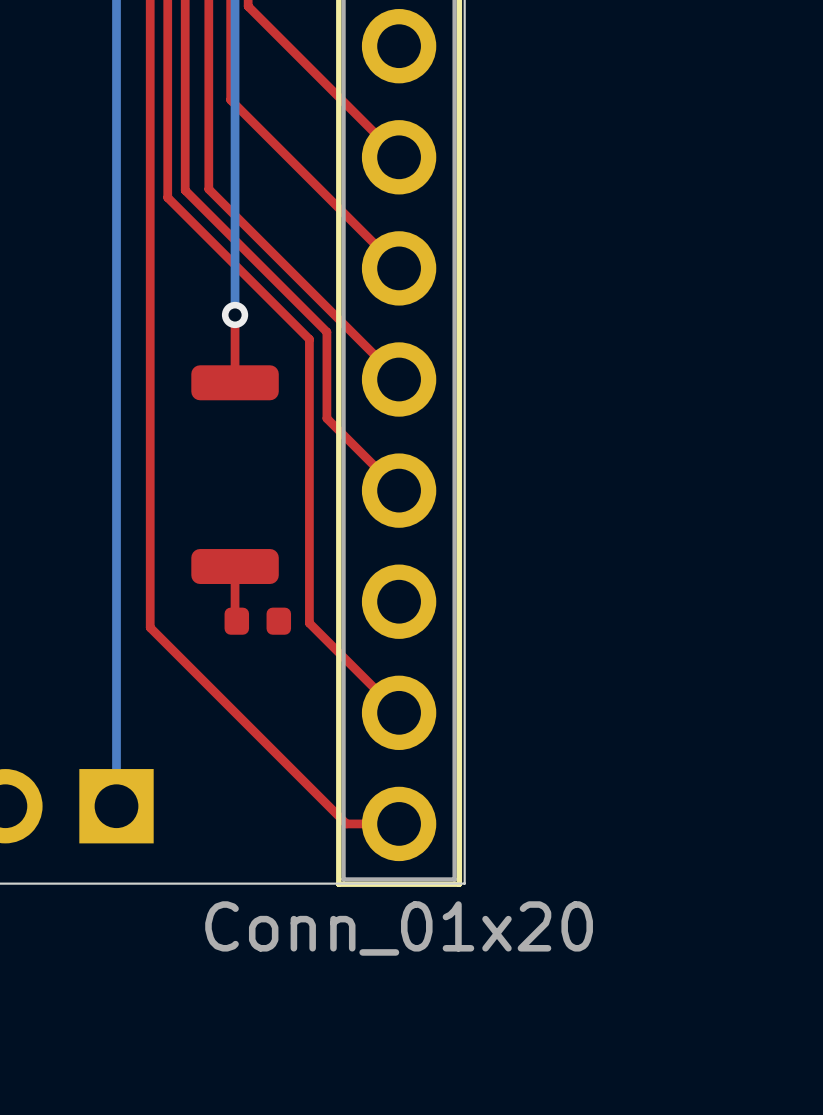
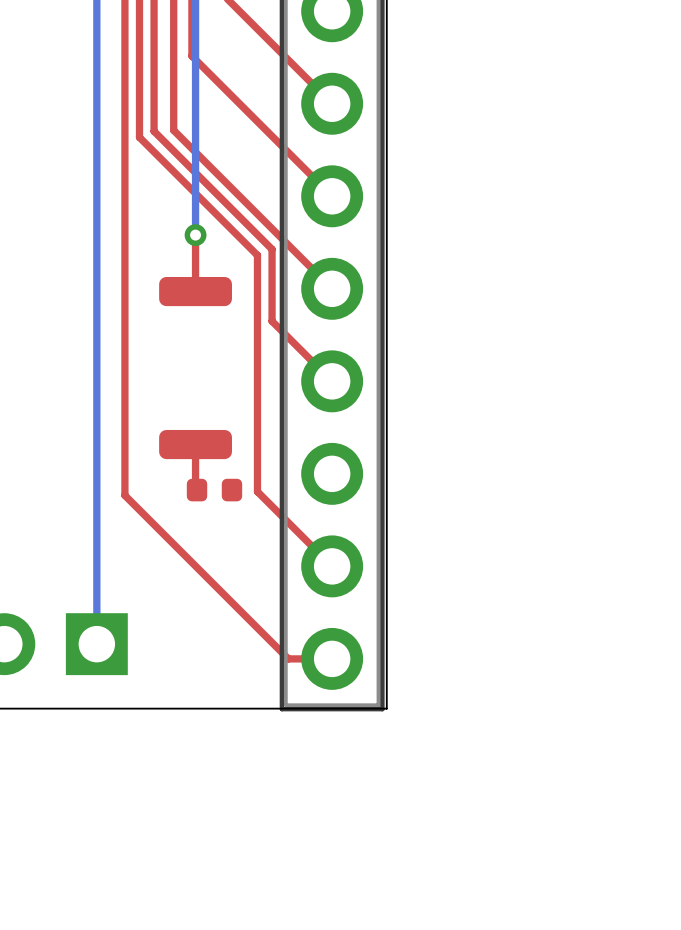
part value: Conn_01x20 (399, 928) -> none

